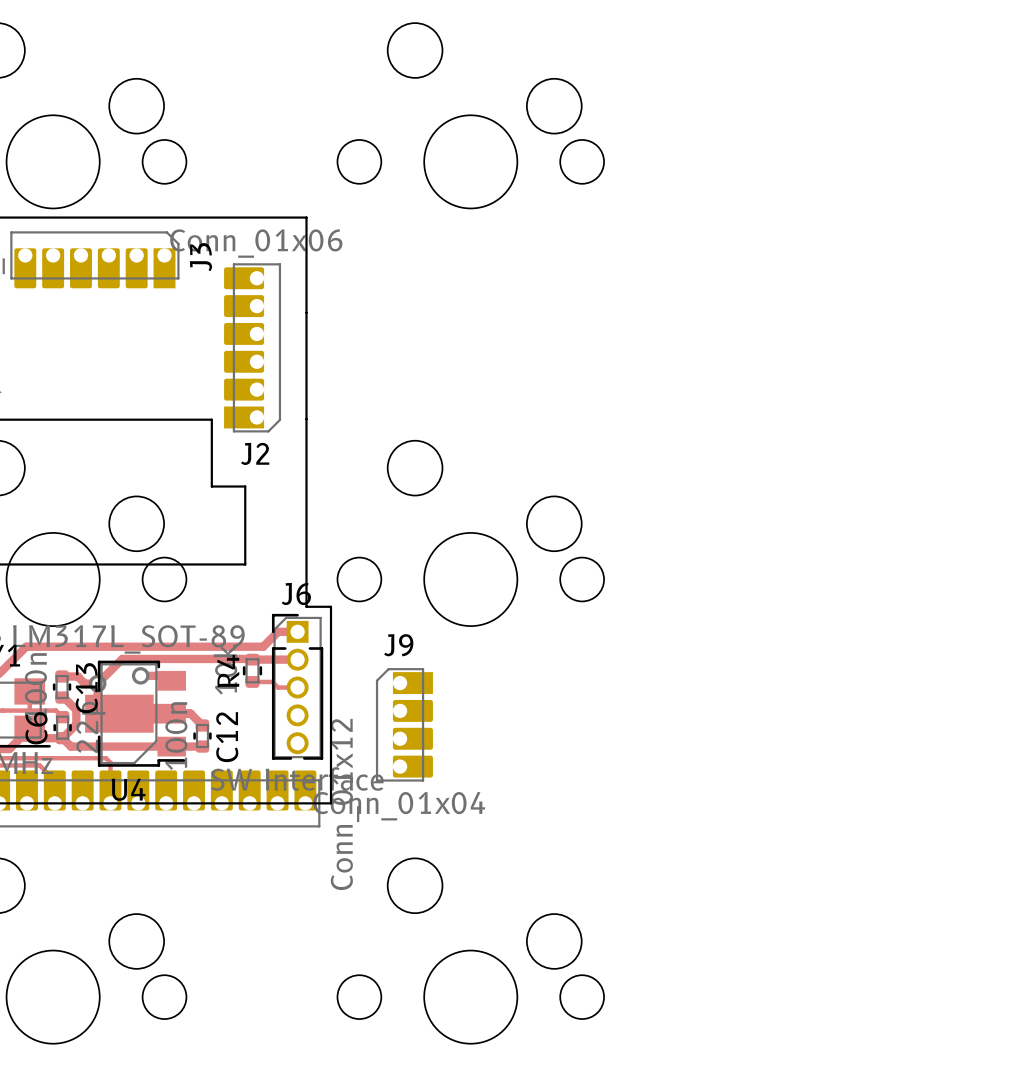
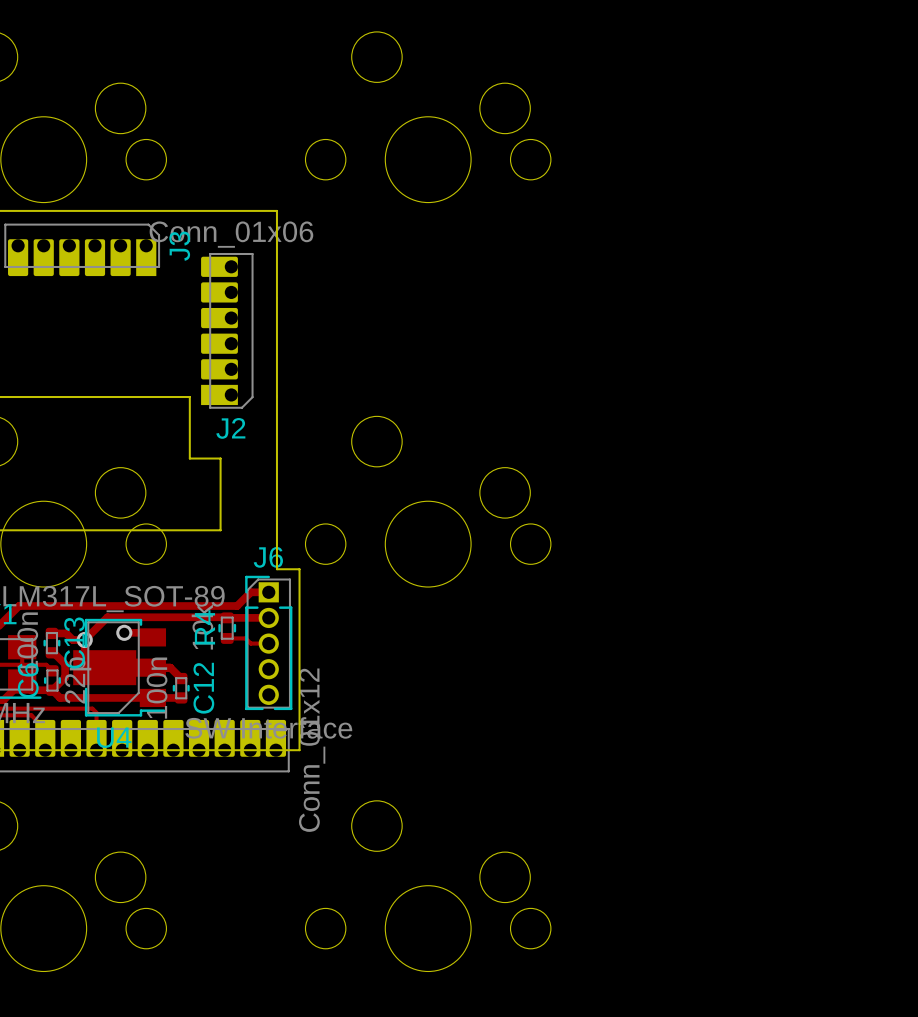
J9: Conn_01x04 (404, 724) -> none

